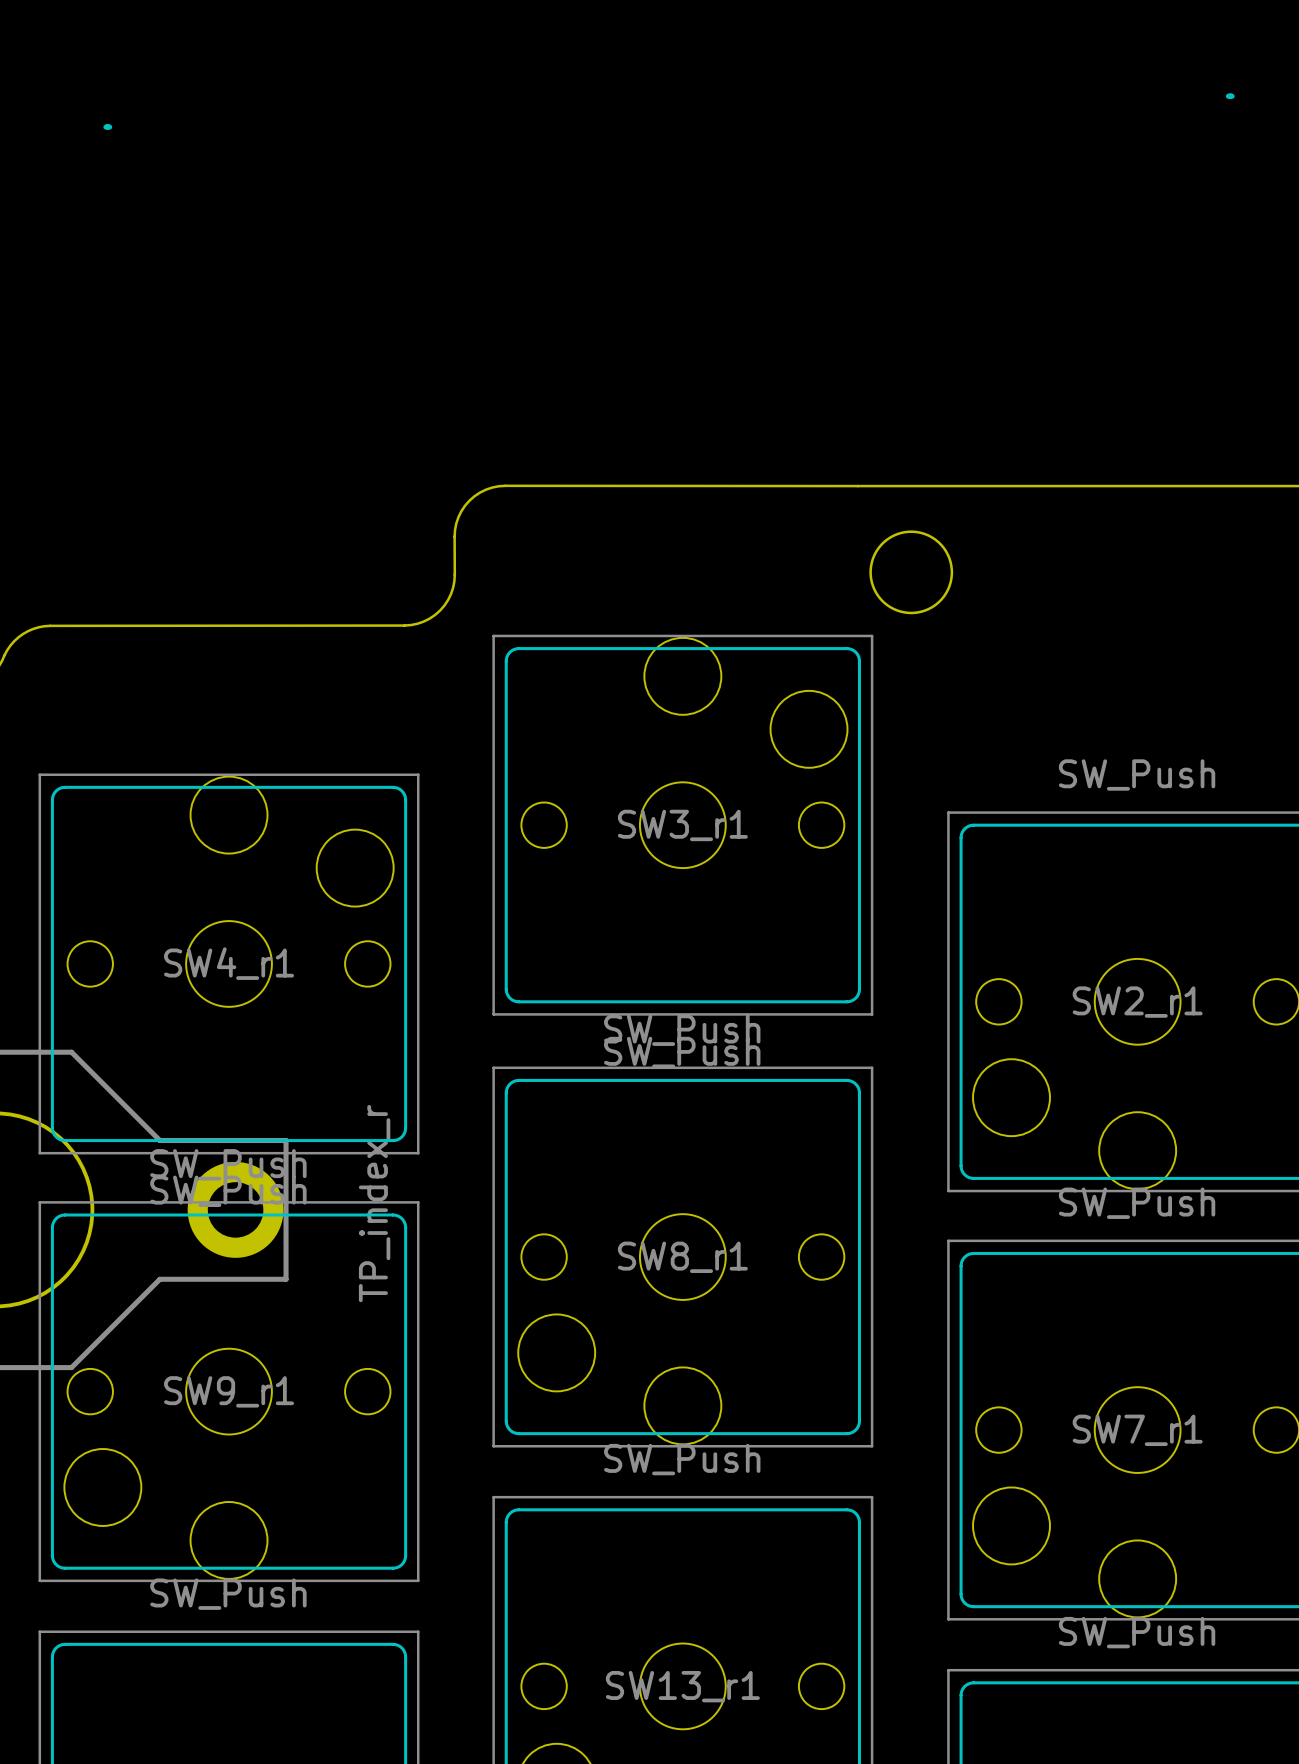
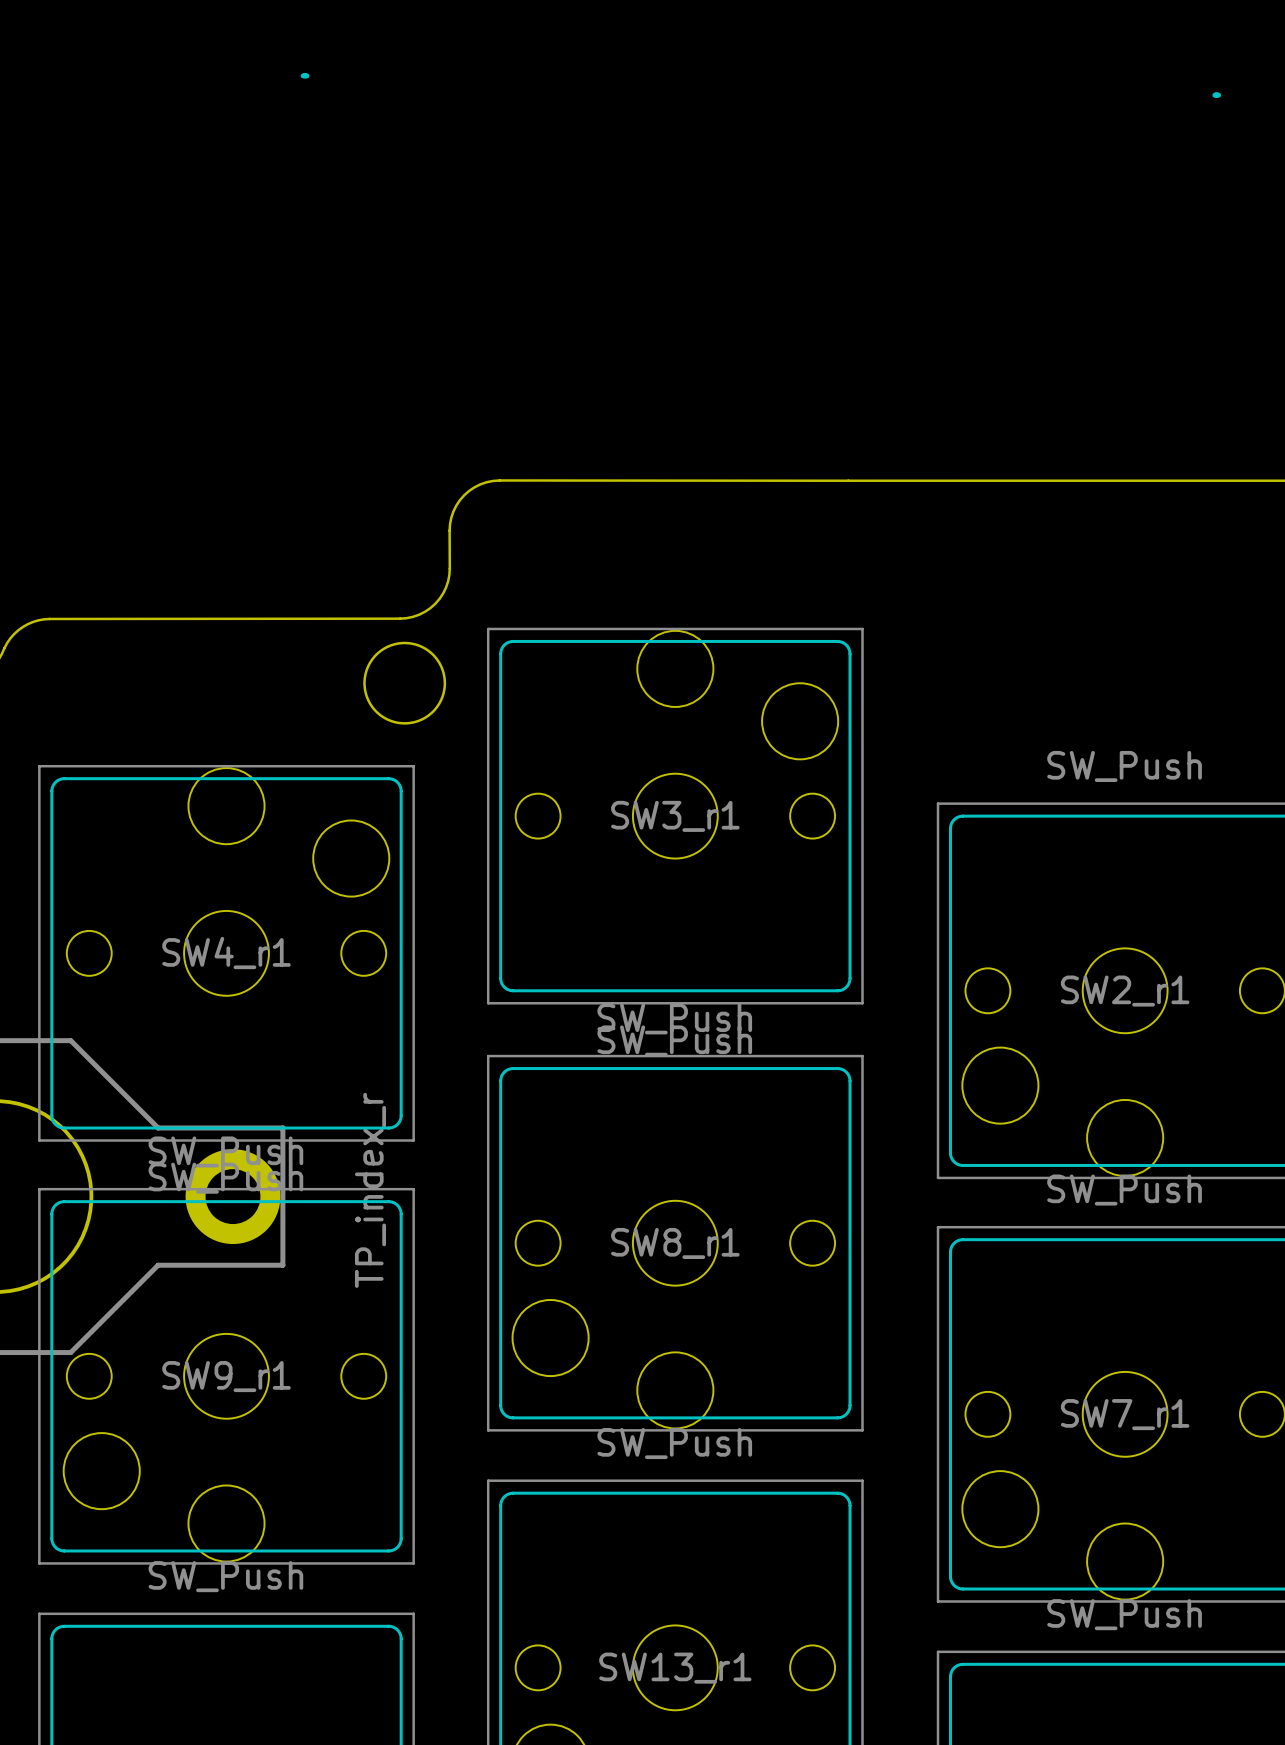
drawing position: (107, 126) -> (305, 75)
round board edge position: (911, 572) -> (404, 683)

